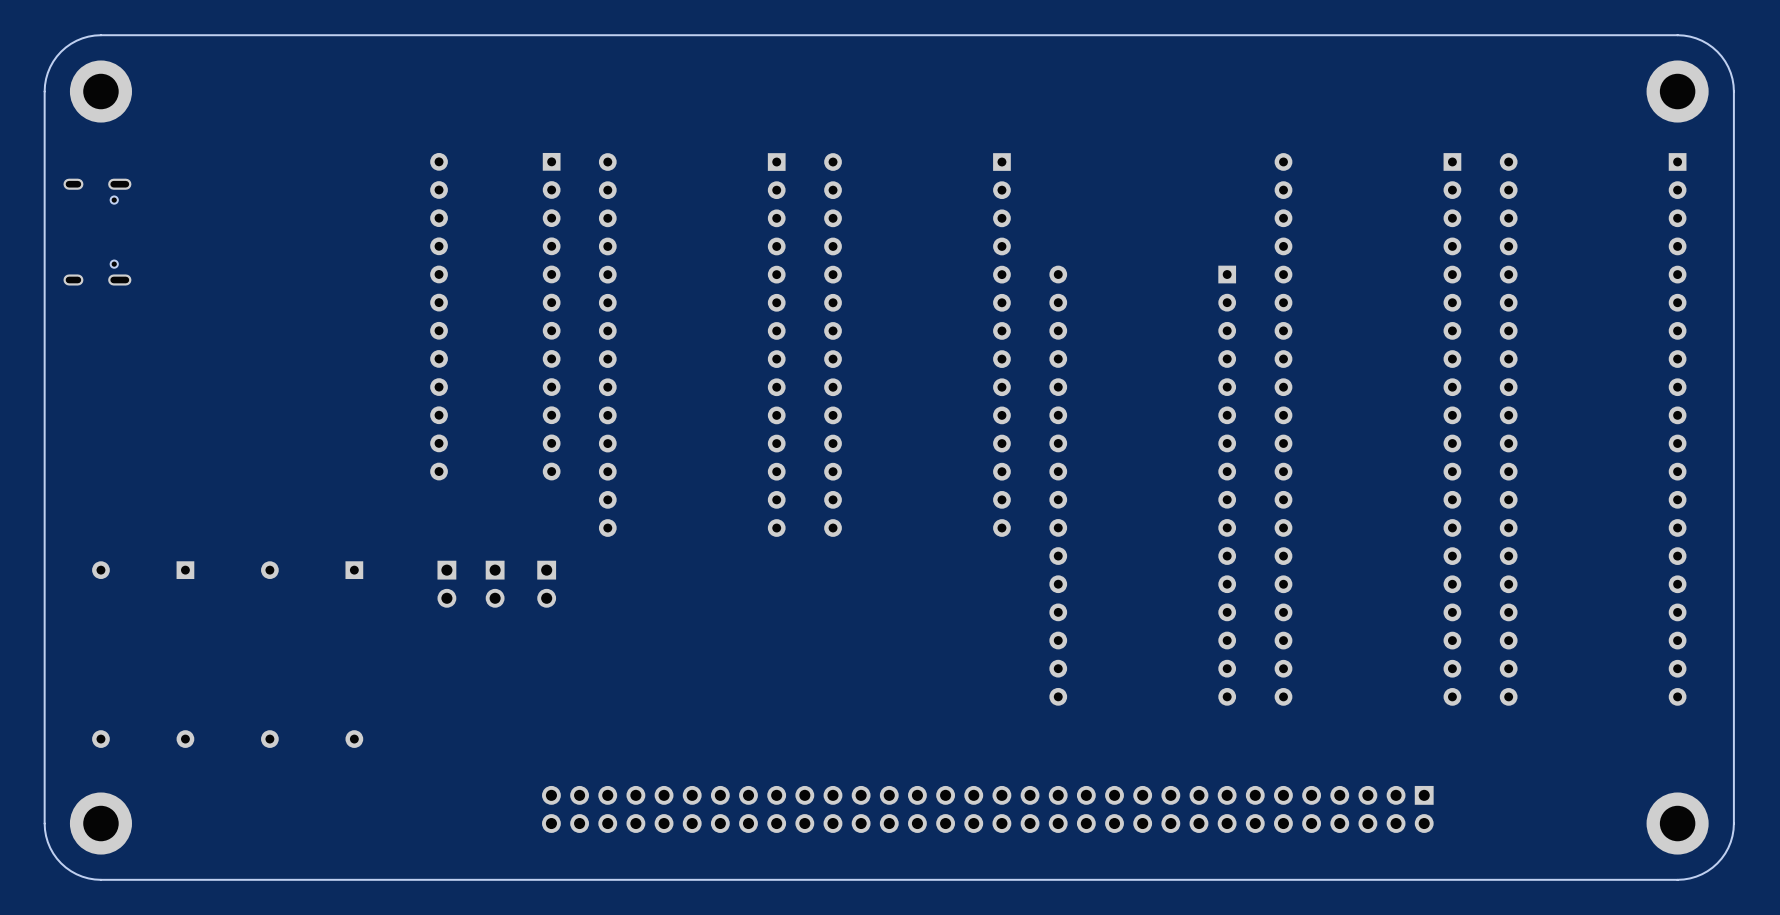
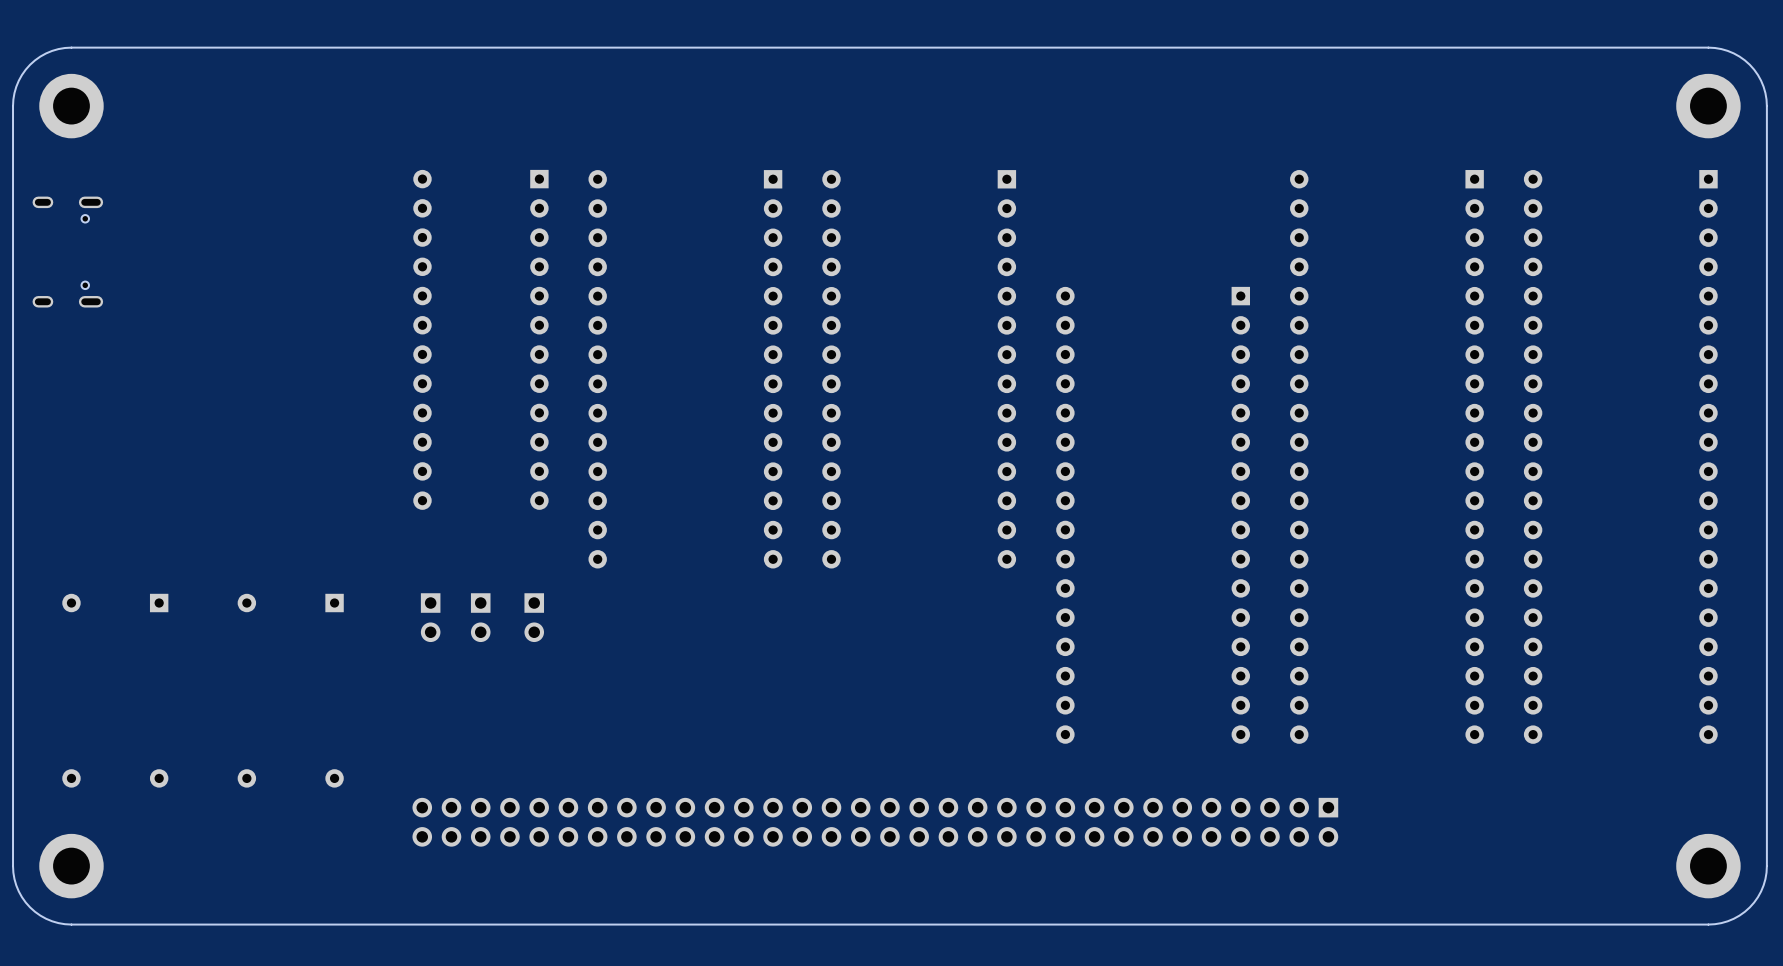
part position: (987, 809) -> (875, 822)

